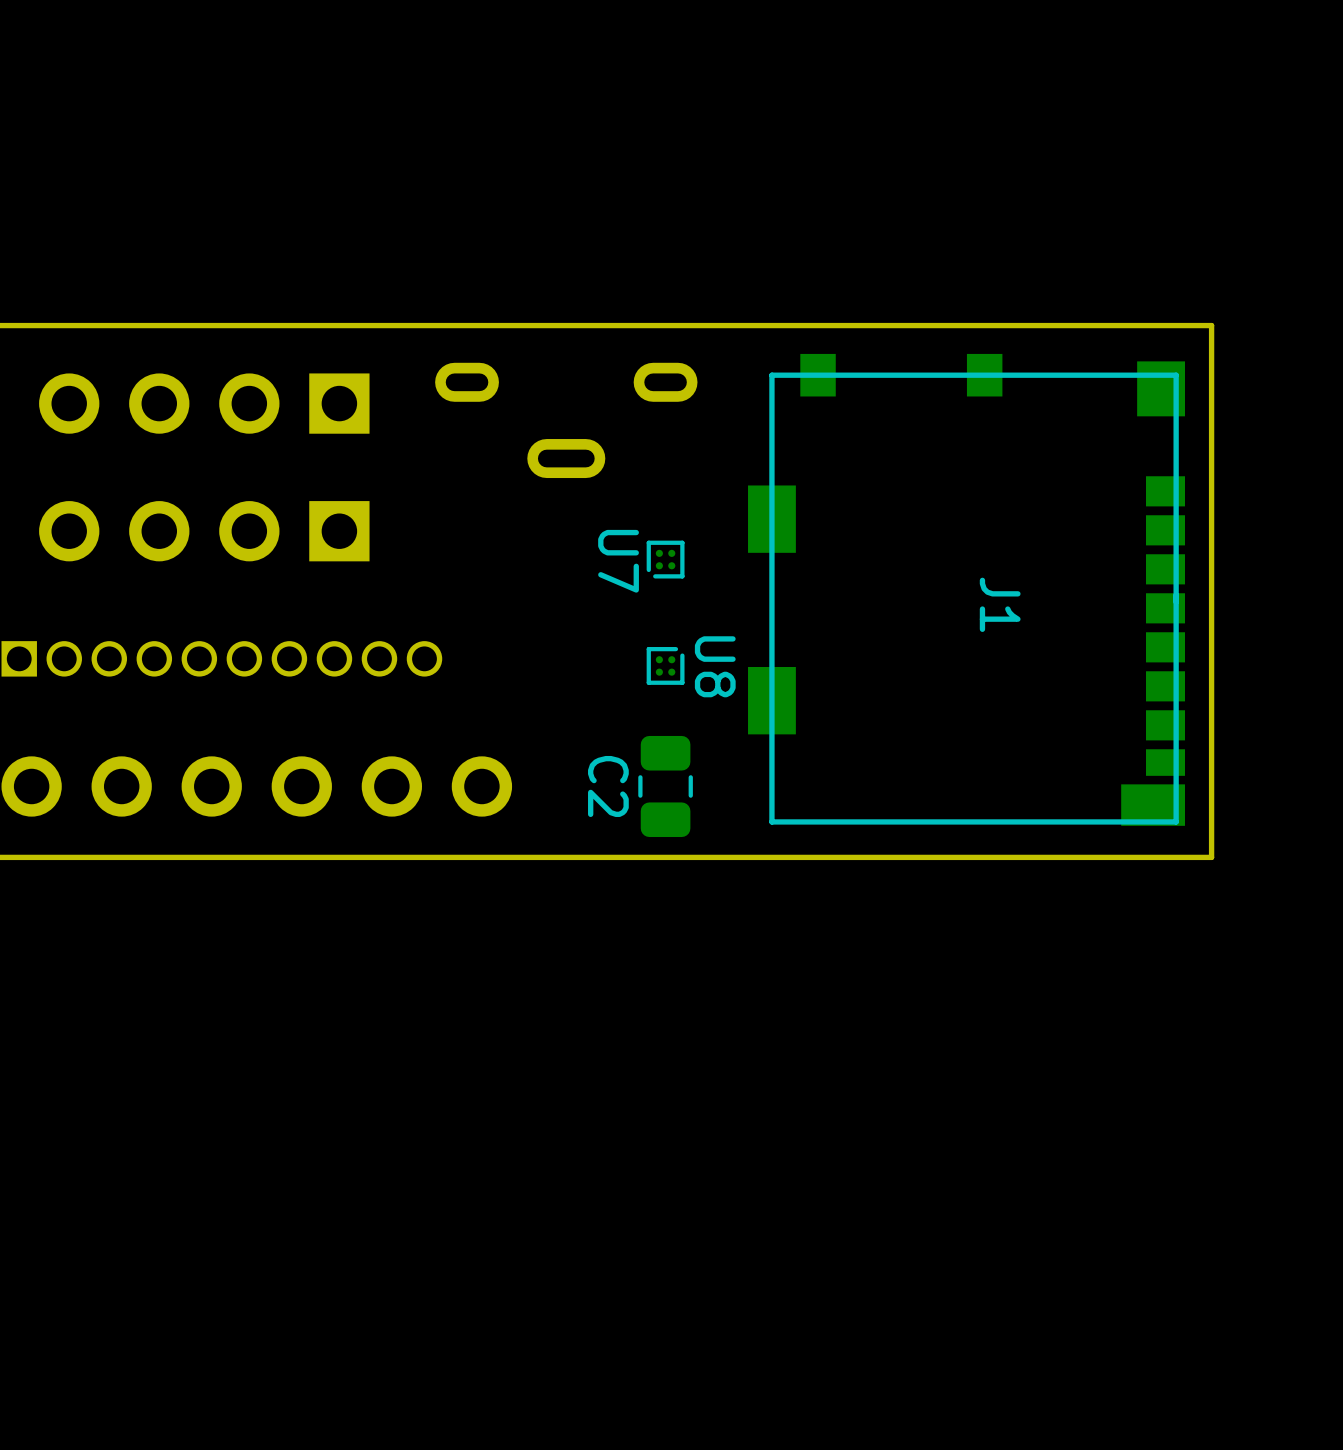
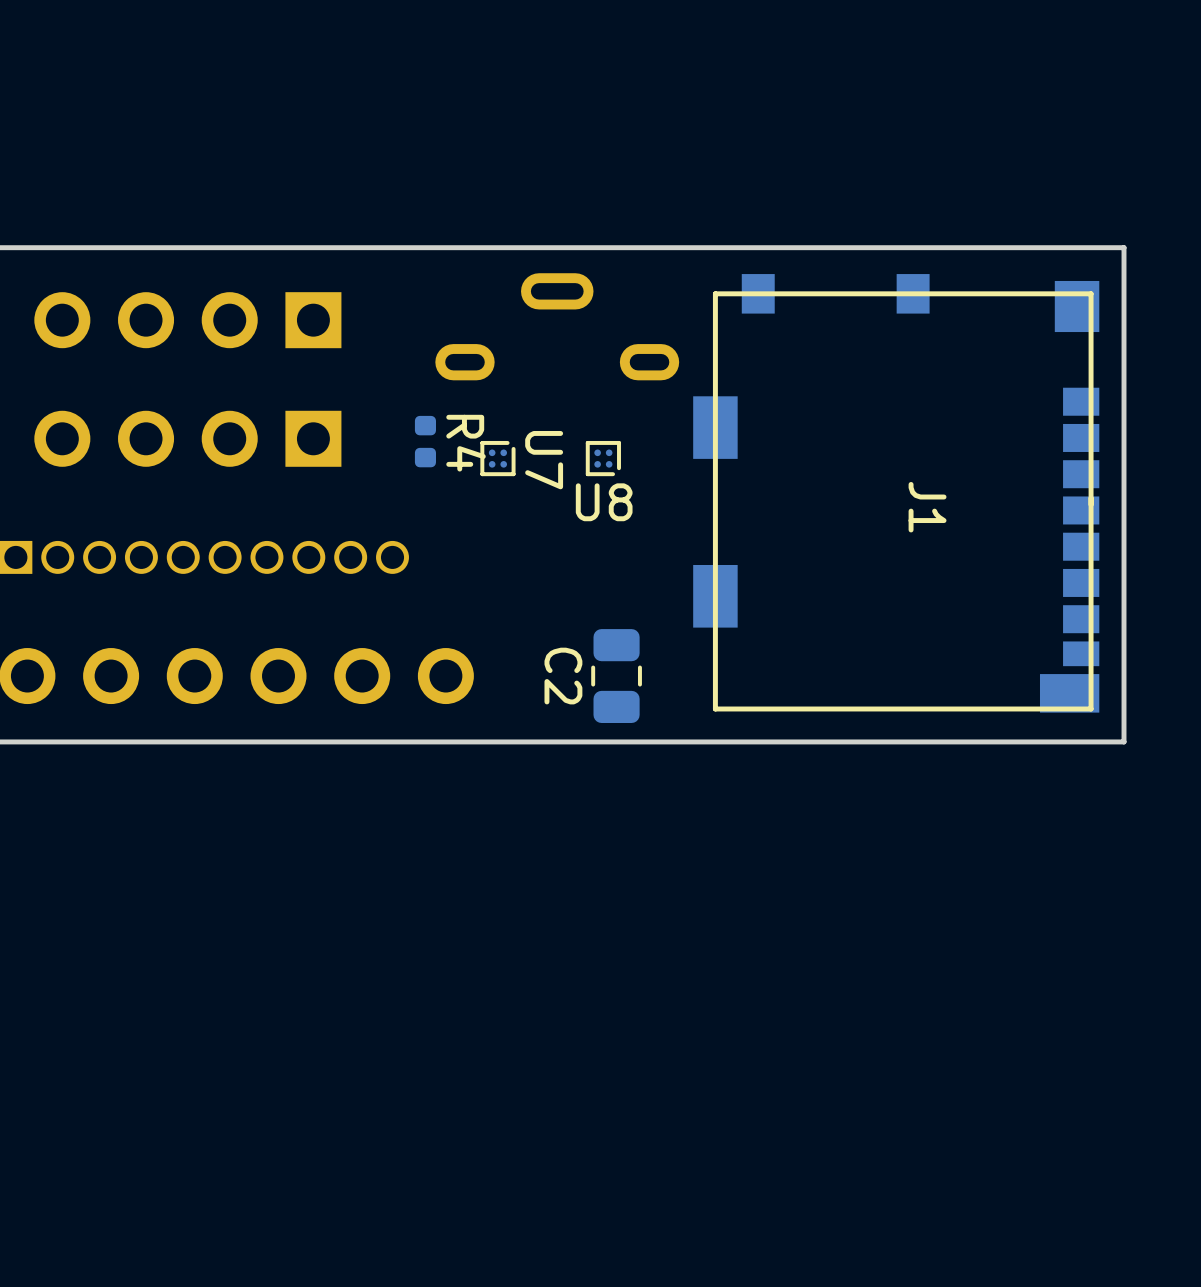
part rotation: 0° (566, 420) -> 180° (557, 326)
R4: none -> (425, 441)
U7 rotation: 0° (665, 559) -> 180° (497, 458)
U7 position: (665, 559) -> (497, 458)
U8 rotation: 0° (665, 665) -> 90° clockwise (603, 458)
U8 position: (665, 665) -> (603, 458)

